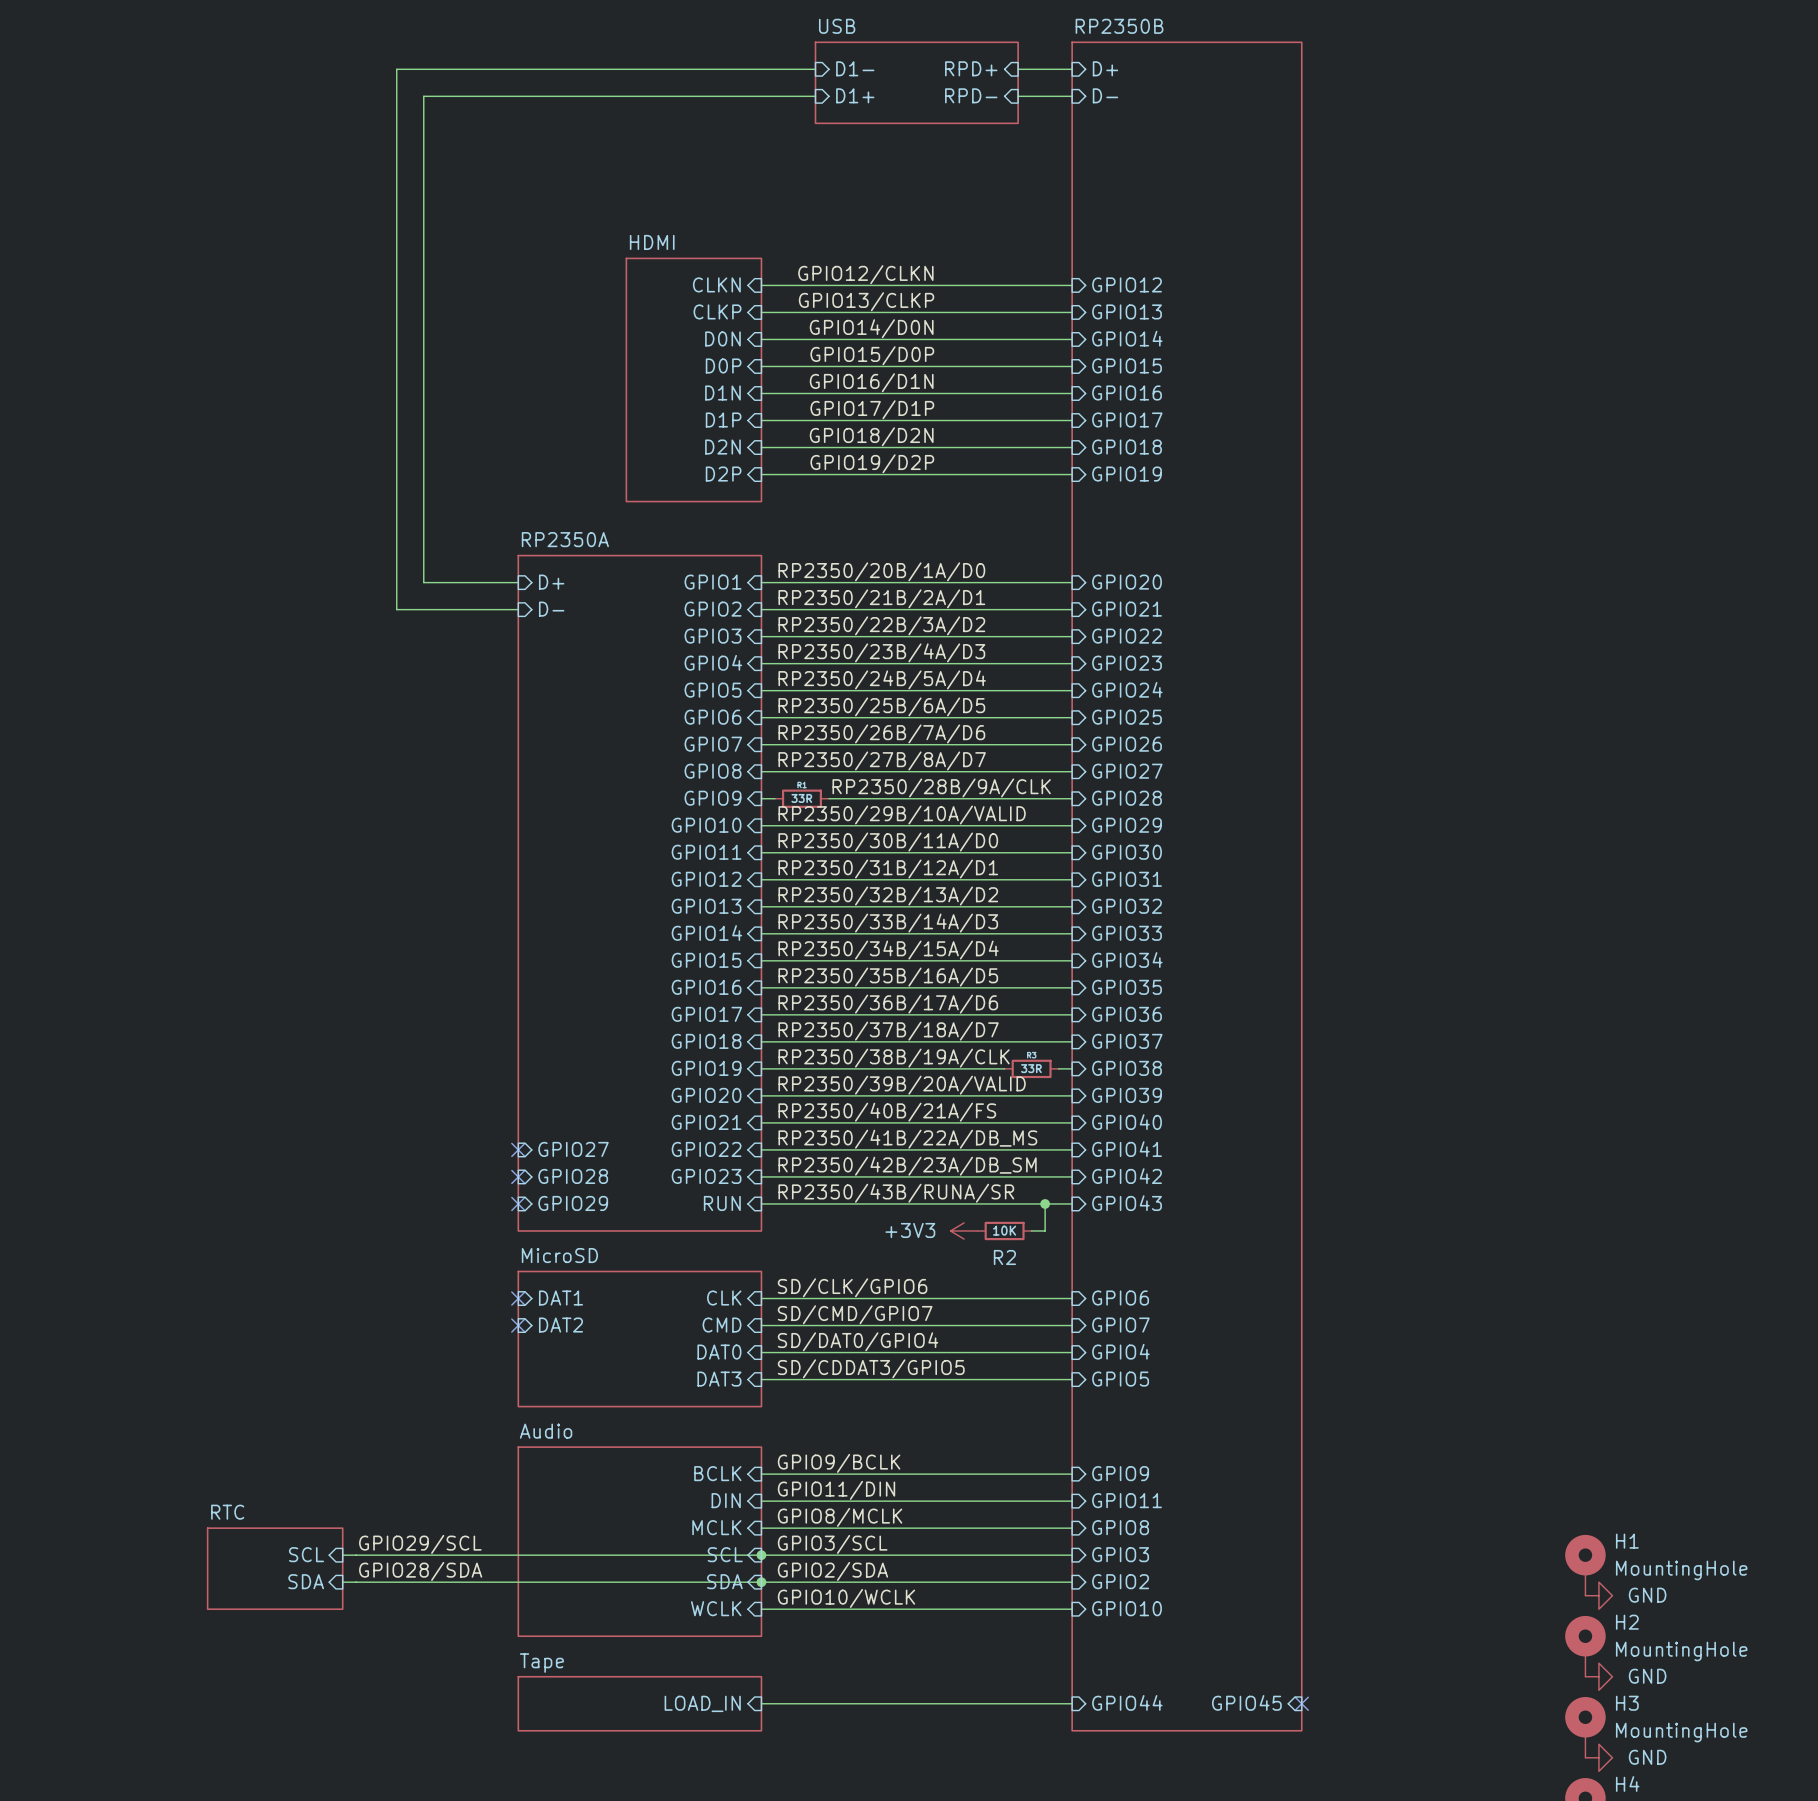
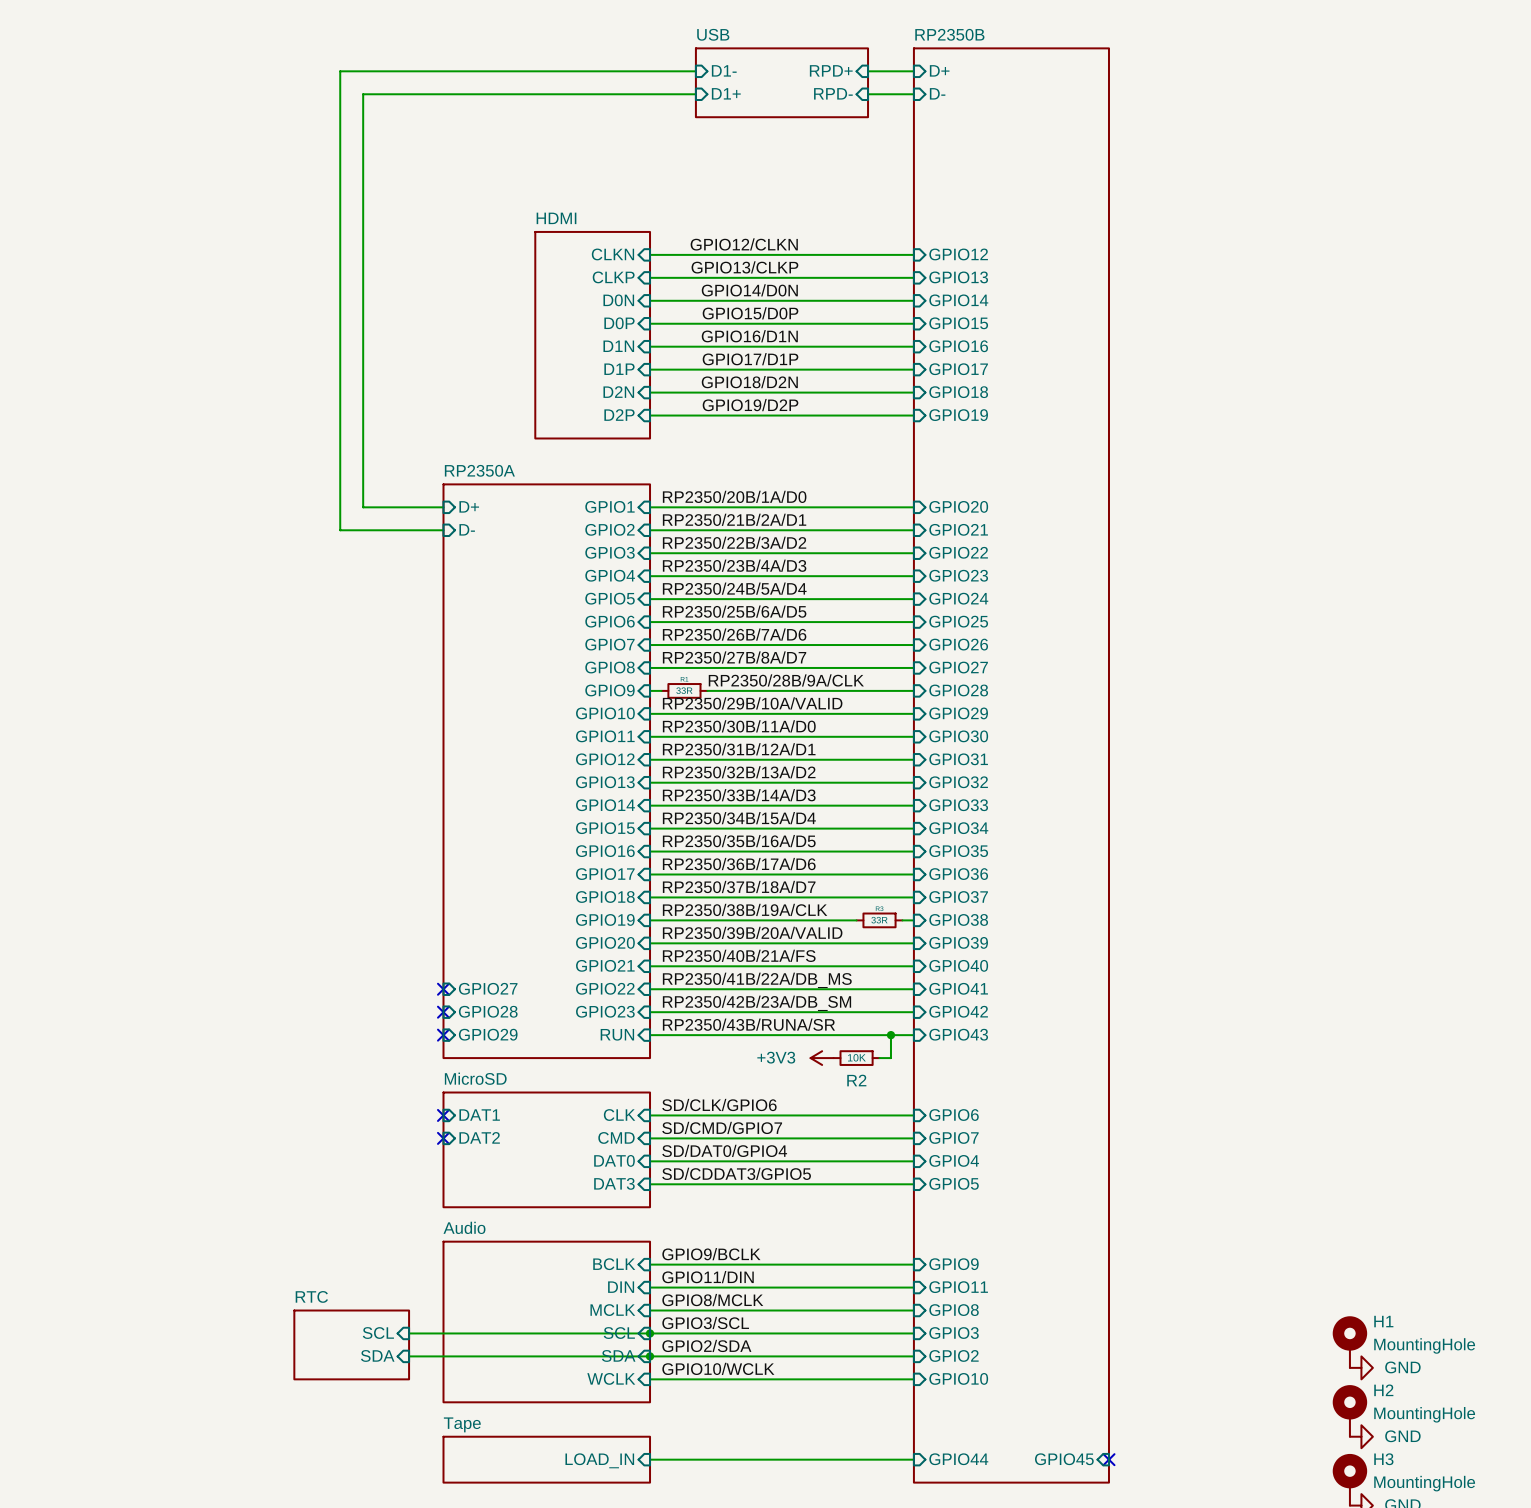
label: GPIO29/SCL (420, 1544) -> none
sheet pin position: SCL (306, 1554) -> SCL (378, 1333)
wire: (342, 1555) (477, 1555) -> none
sheet RTC position: (275, 1568) -> (351, 1344)
label: GPIO28/SDA (420, 1571) -> none
sheet pin position: SDA (306, 1581) -> SDA (377, 1355)
wire: (342, 1582) (477, 1582) -> none

